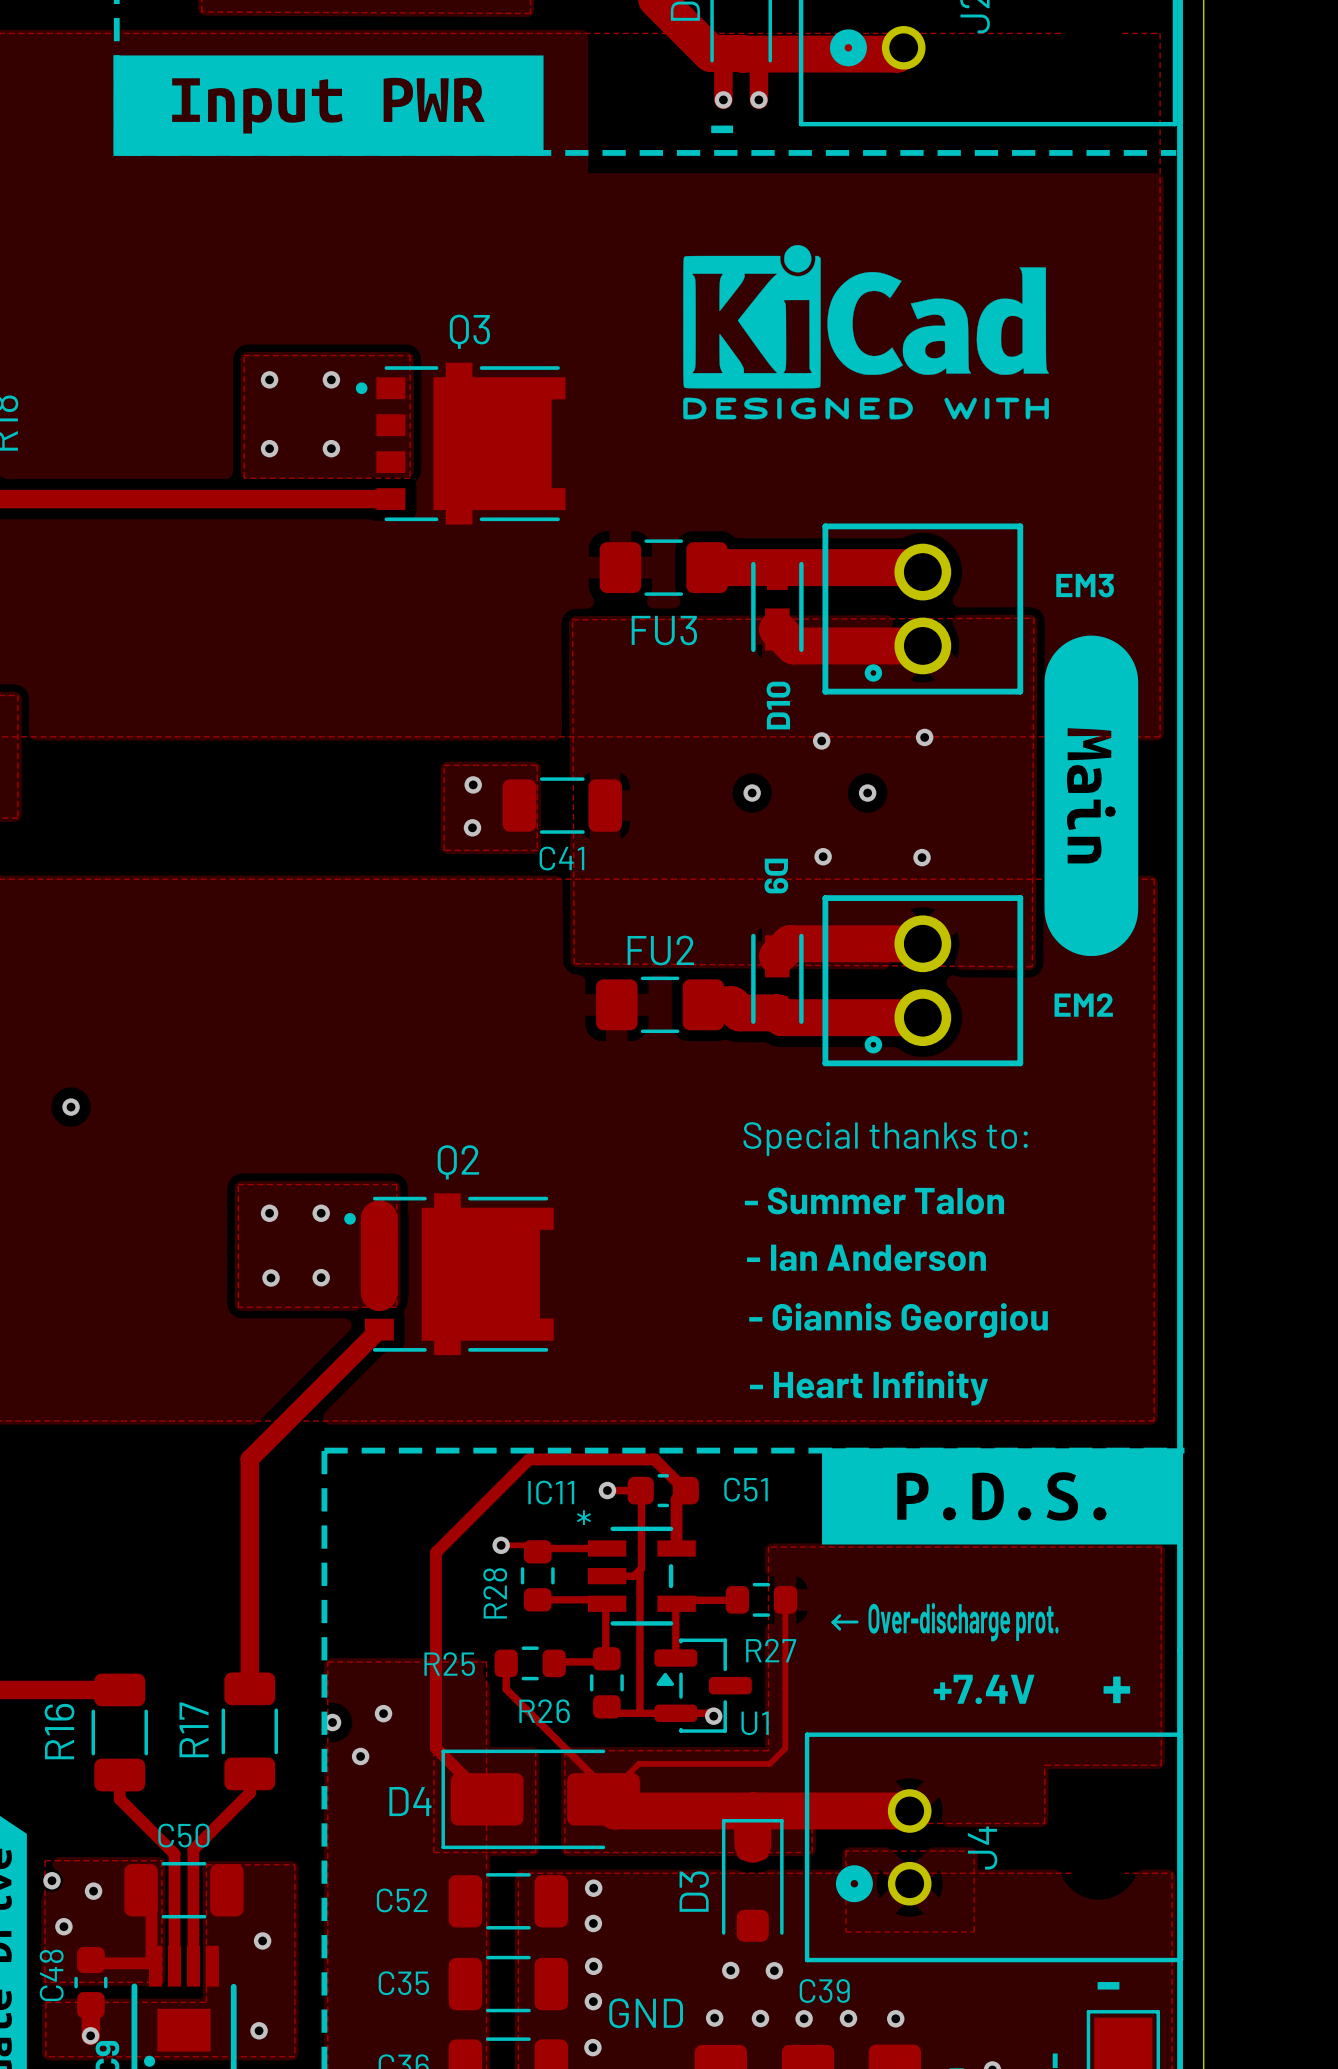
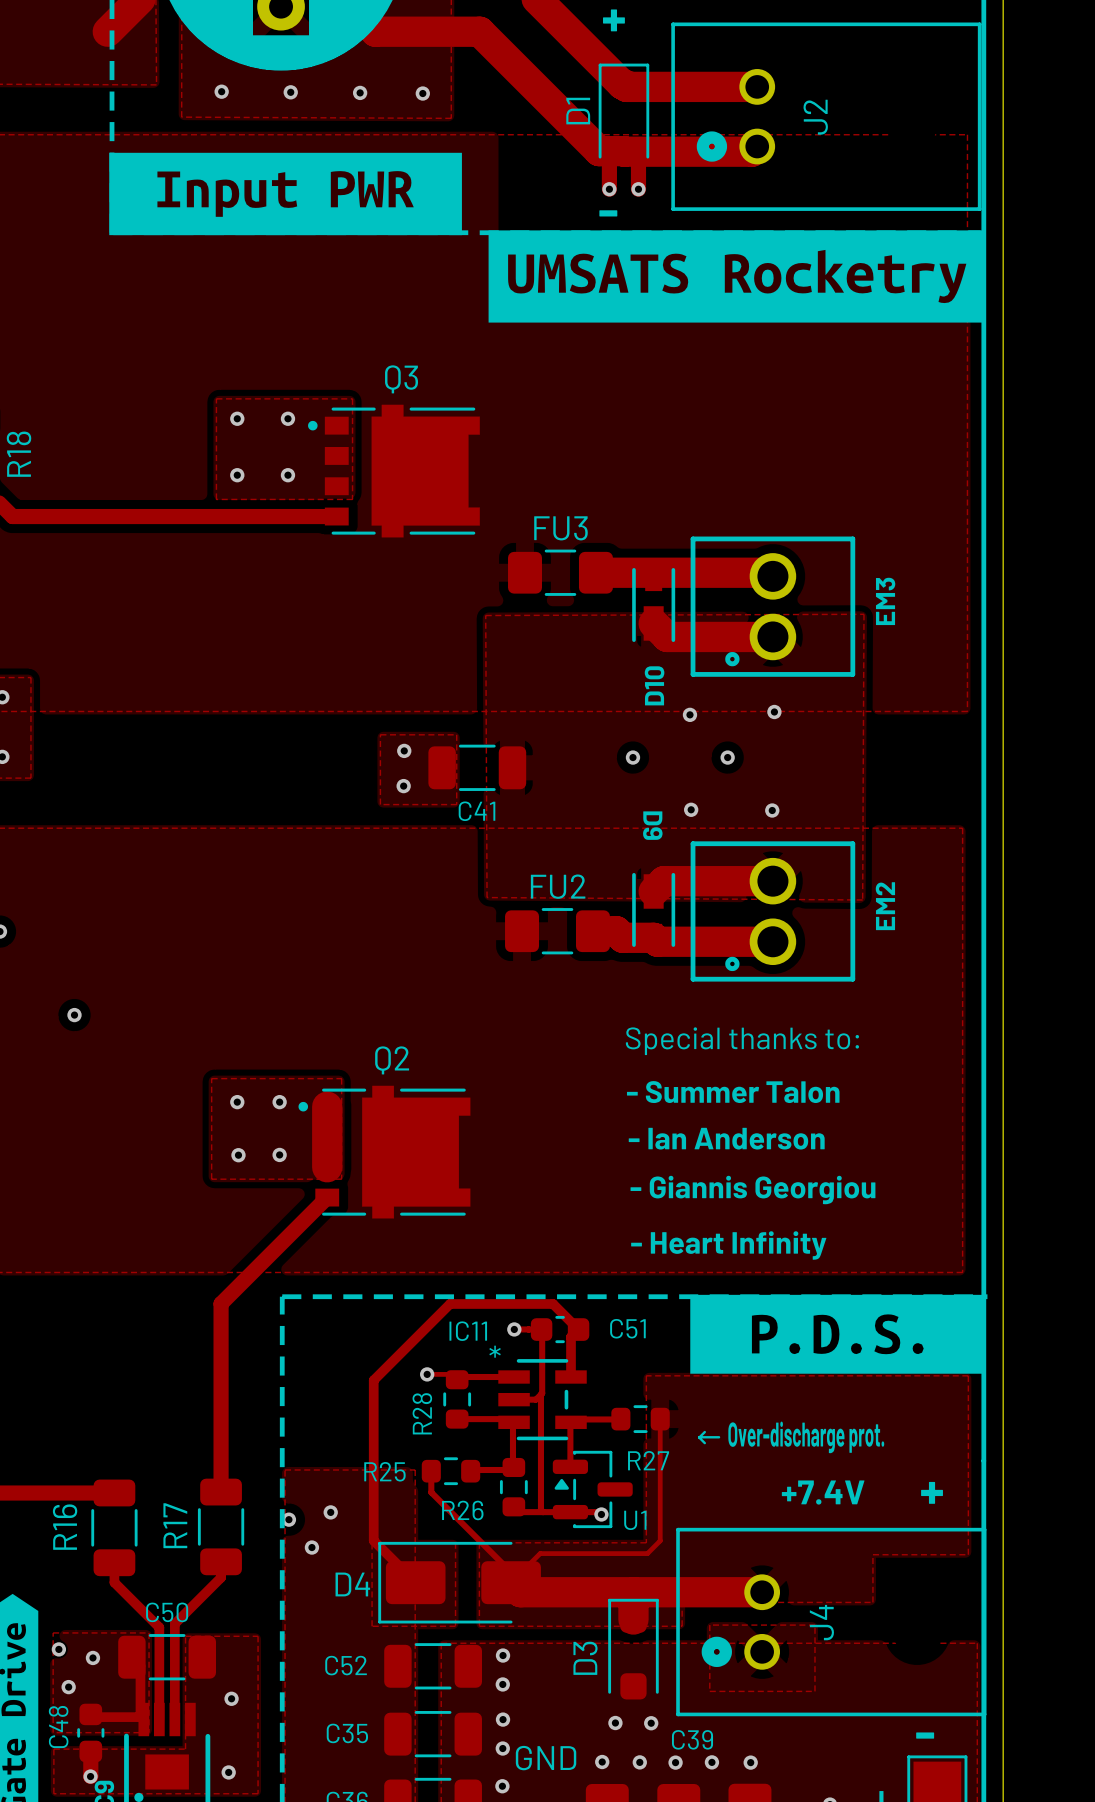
drawing: none -> [488, 230, 986, 323]
drawing: [683, 245, 1049, 420] -> none
EM3 name rotation: 0° (1085, 585) -> 90° counterclockwise (885, 601)
FU3 name position: FU3 (664, 630) -> FU3 (560, 528)
drawing: [1044, 635, 1139, 957] -> none
EM2 name rotation: 0° (1083, 1005) -> 90° counterclockwise (885, 906)

